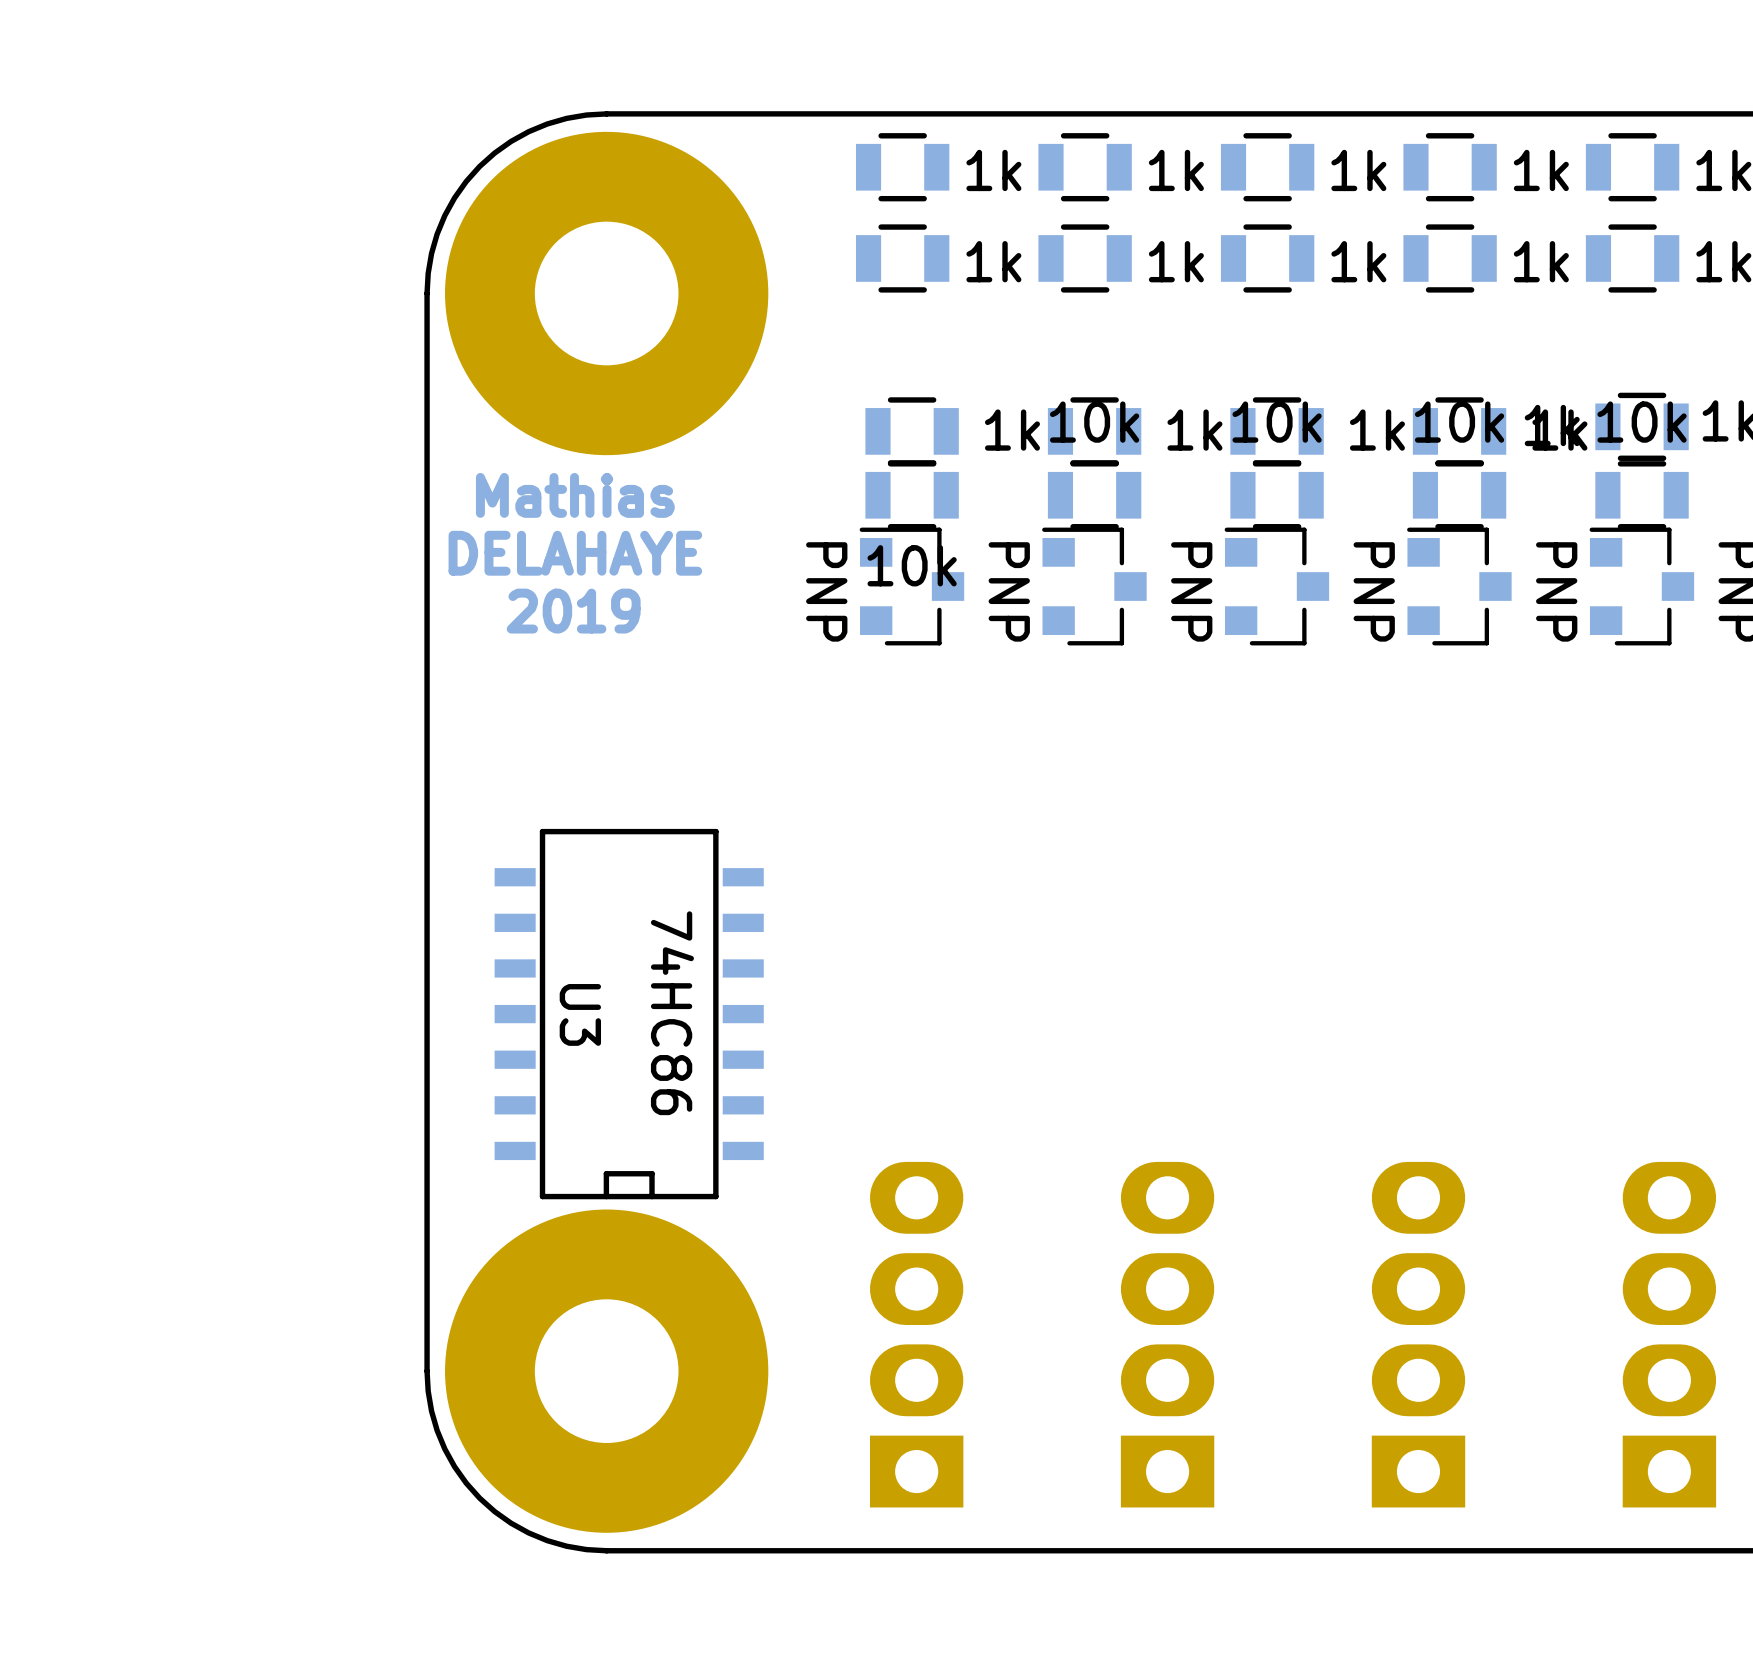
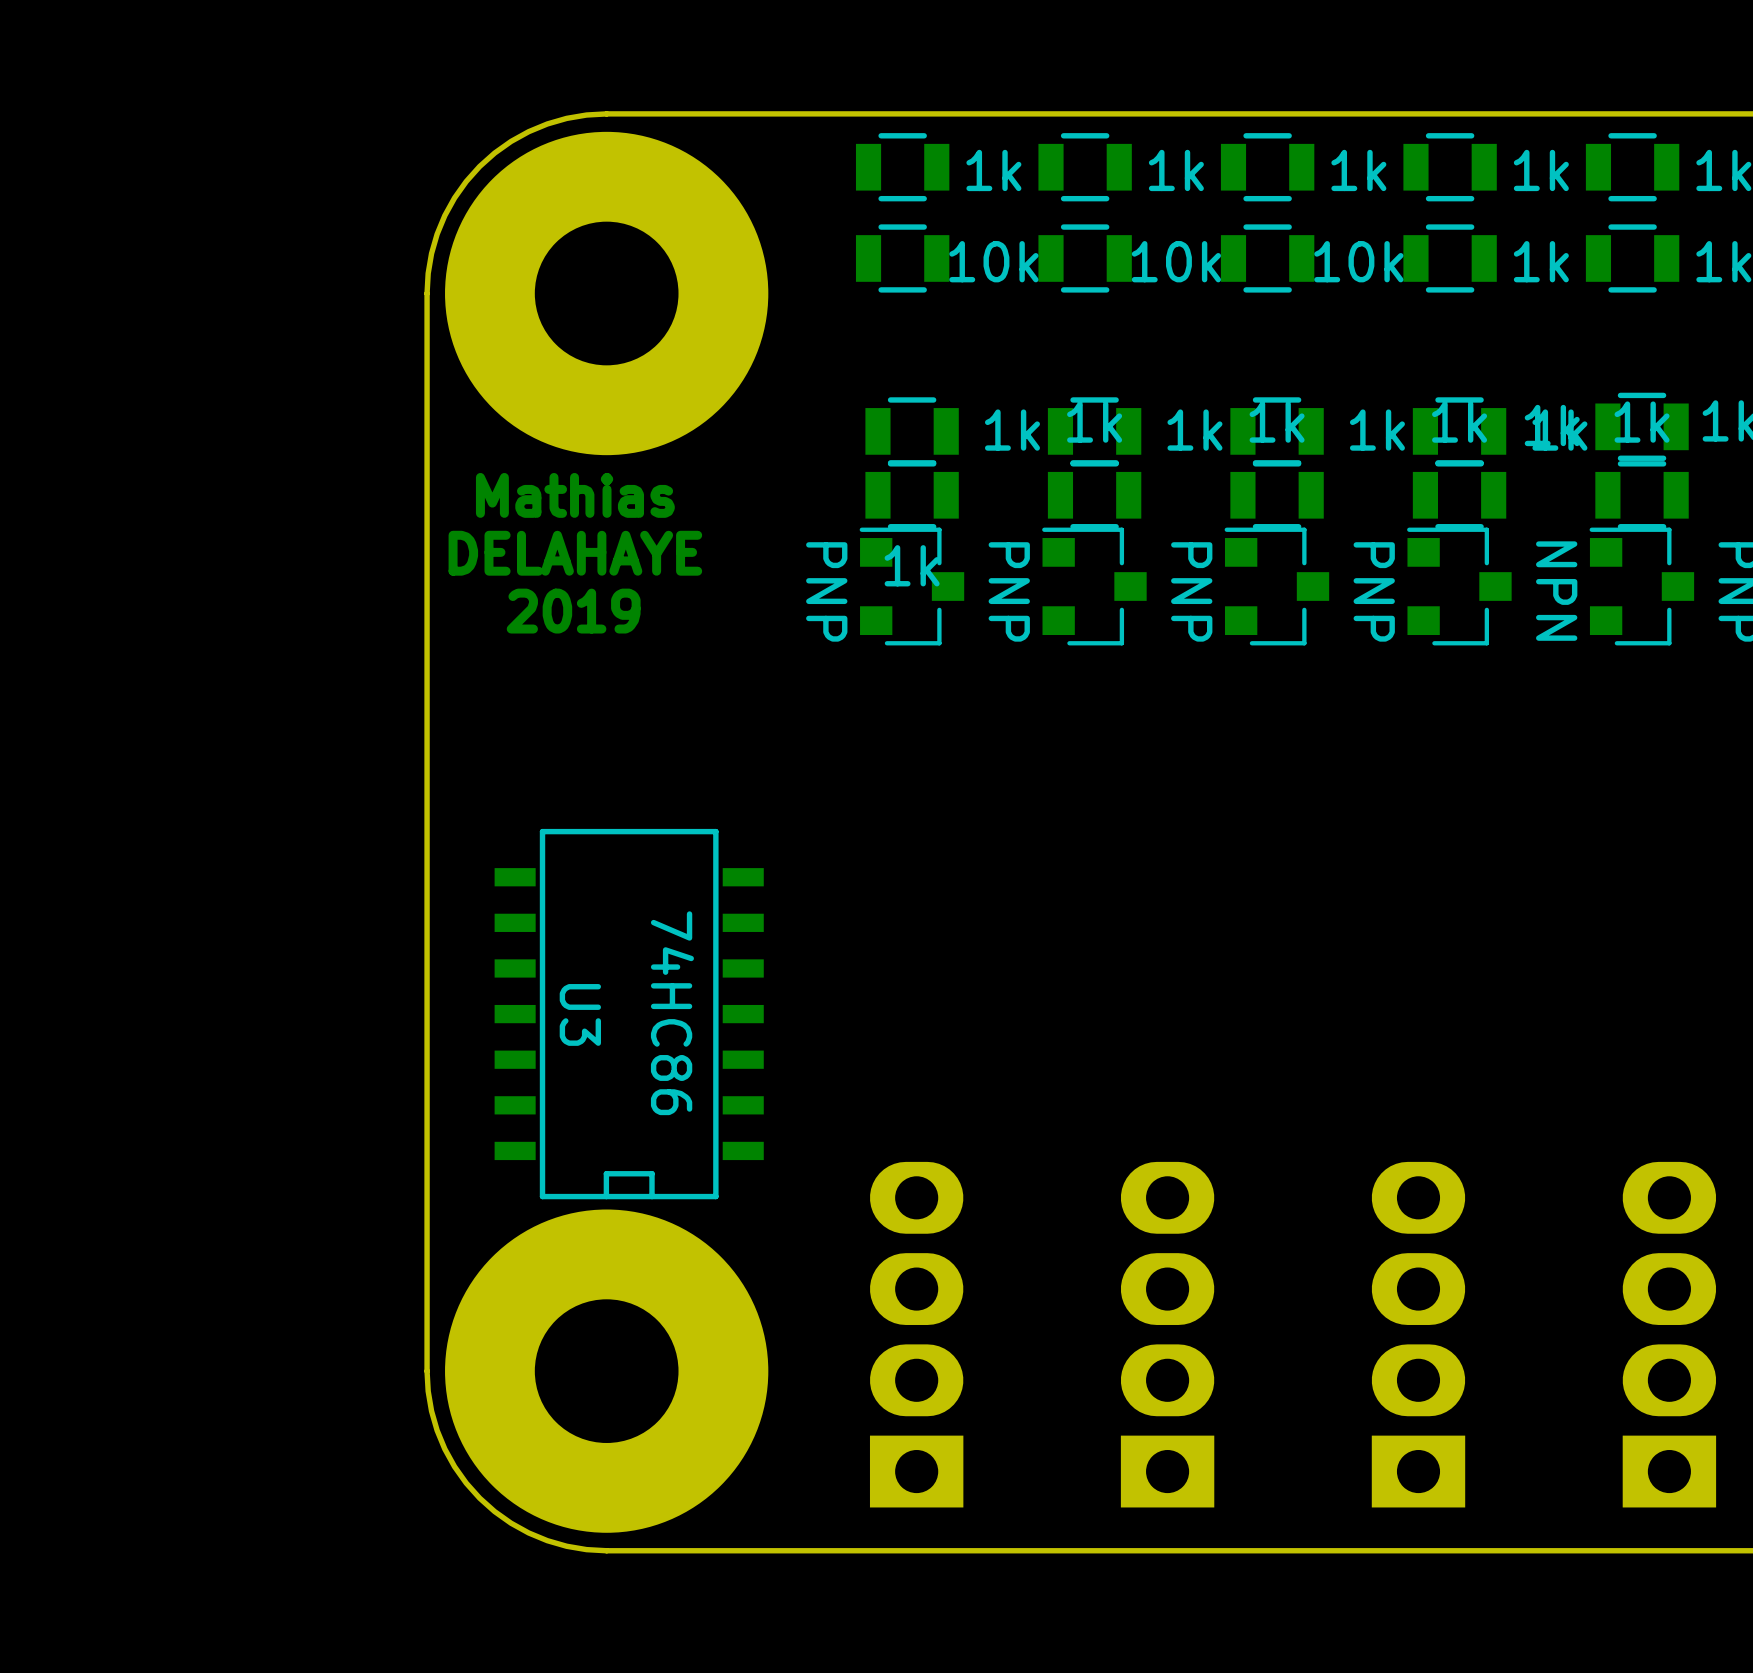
part value: 1k (993, 261) -> 10k (993, 261)
part value: 1k (1176, 261) -> 10k (1176, 261)
part value: 1k (1358, 261) -> 10k (1358, 261)
part value: 10k (1094, 422) -> 1k (1094, 422)
part value: 10k (1277, 422) -> 1k (1277, 422)
part value: 10k (1459, 422) -> 1k (1459, 422)
part value: 10k (1642, 422) -> 1k (1642, 422)
part value: 10k (912, 565) -> 1k (912, 565)
part value: PNP (1556, 591) -> NPN (1556, 591)

